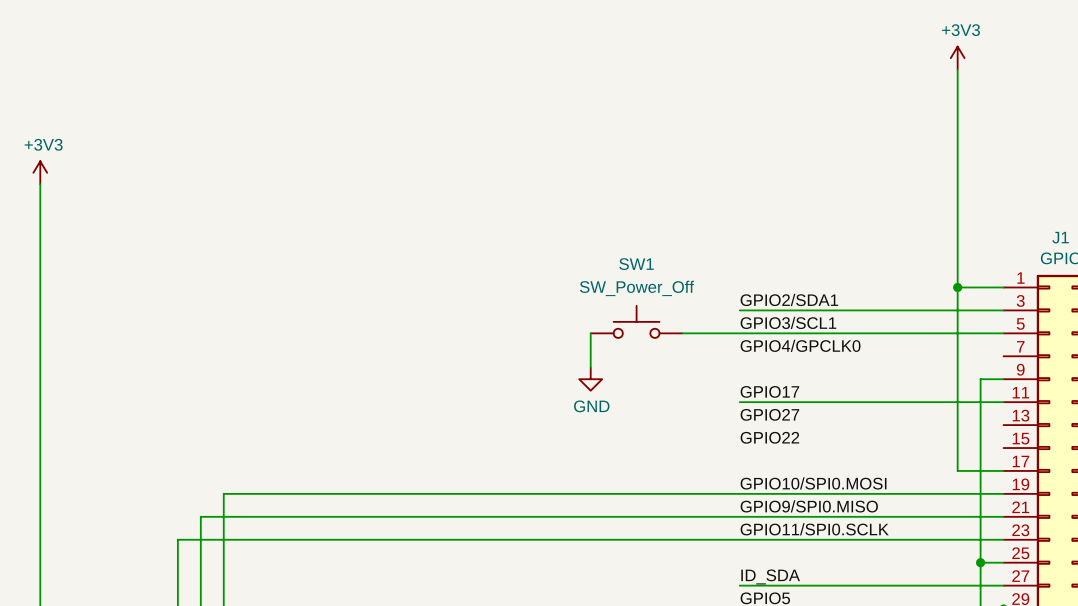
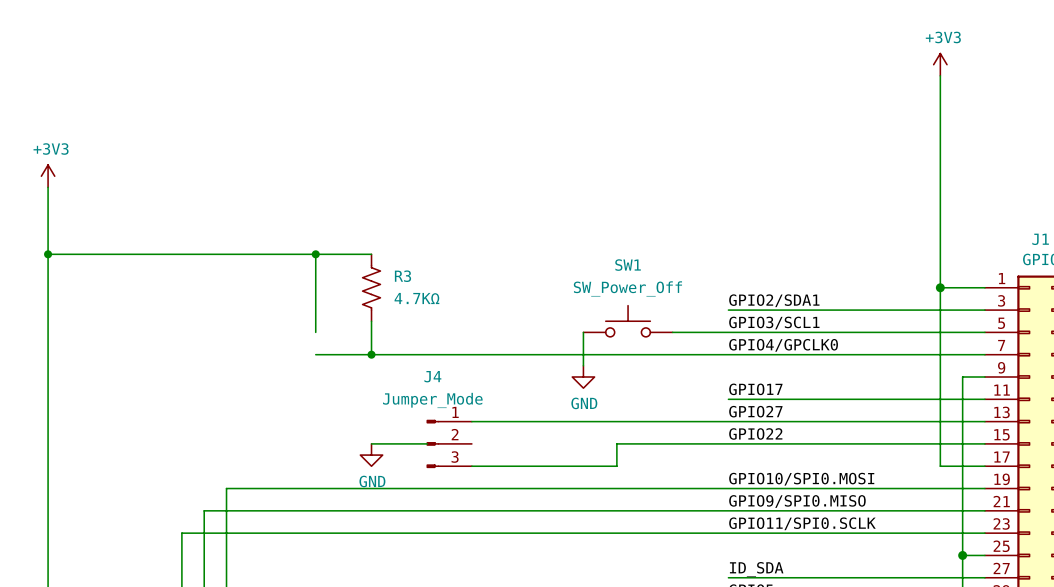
wire: none -> (48, 254) (371, 254)
junction: none -> (48, 254)
wire: none -> (315, 254) (315, 332)
junction: none -> (315, 254)
R3: none -> 4.7KΩ (371, 287)
wire: none -> (371, 321) (371, 354)
wire: none -> (315, 354) (984, 354)
junction: none -> (371, 354)
wire: none -> (471, 421) (984, 421)
wire: none -> (371, 443) (427, 443)
J4: none -> Jumper_Mode (449, 443)
wire: none -> (984, 443) (616, 443) (616, 466) (471, 466)
power symbol: none -> GND (371, 455)

